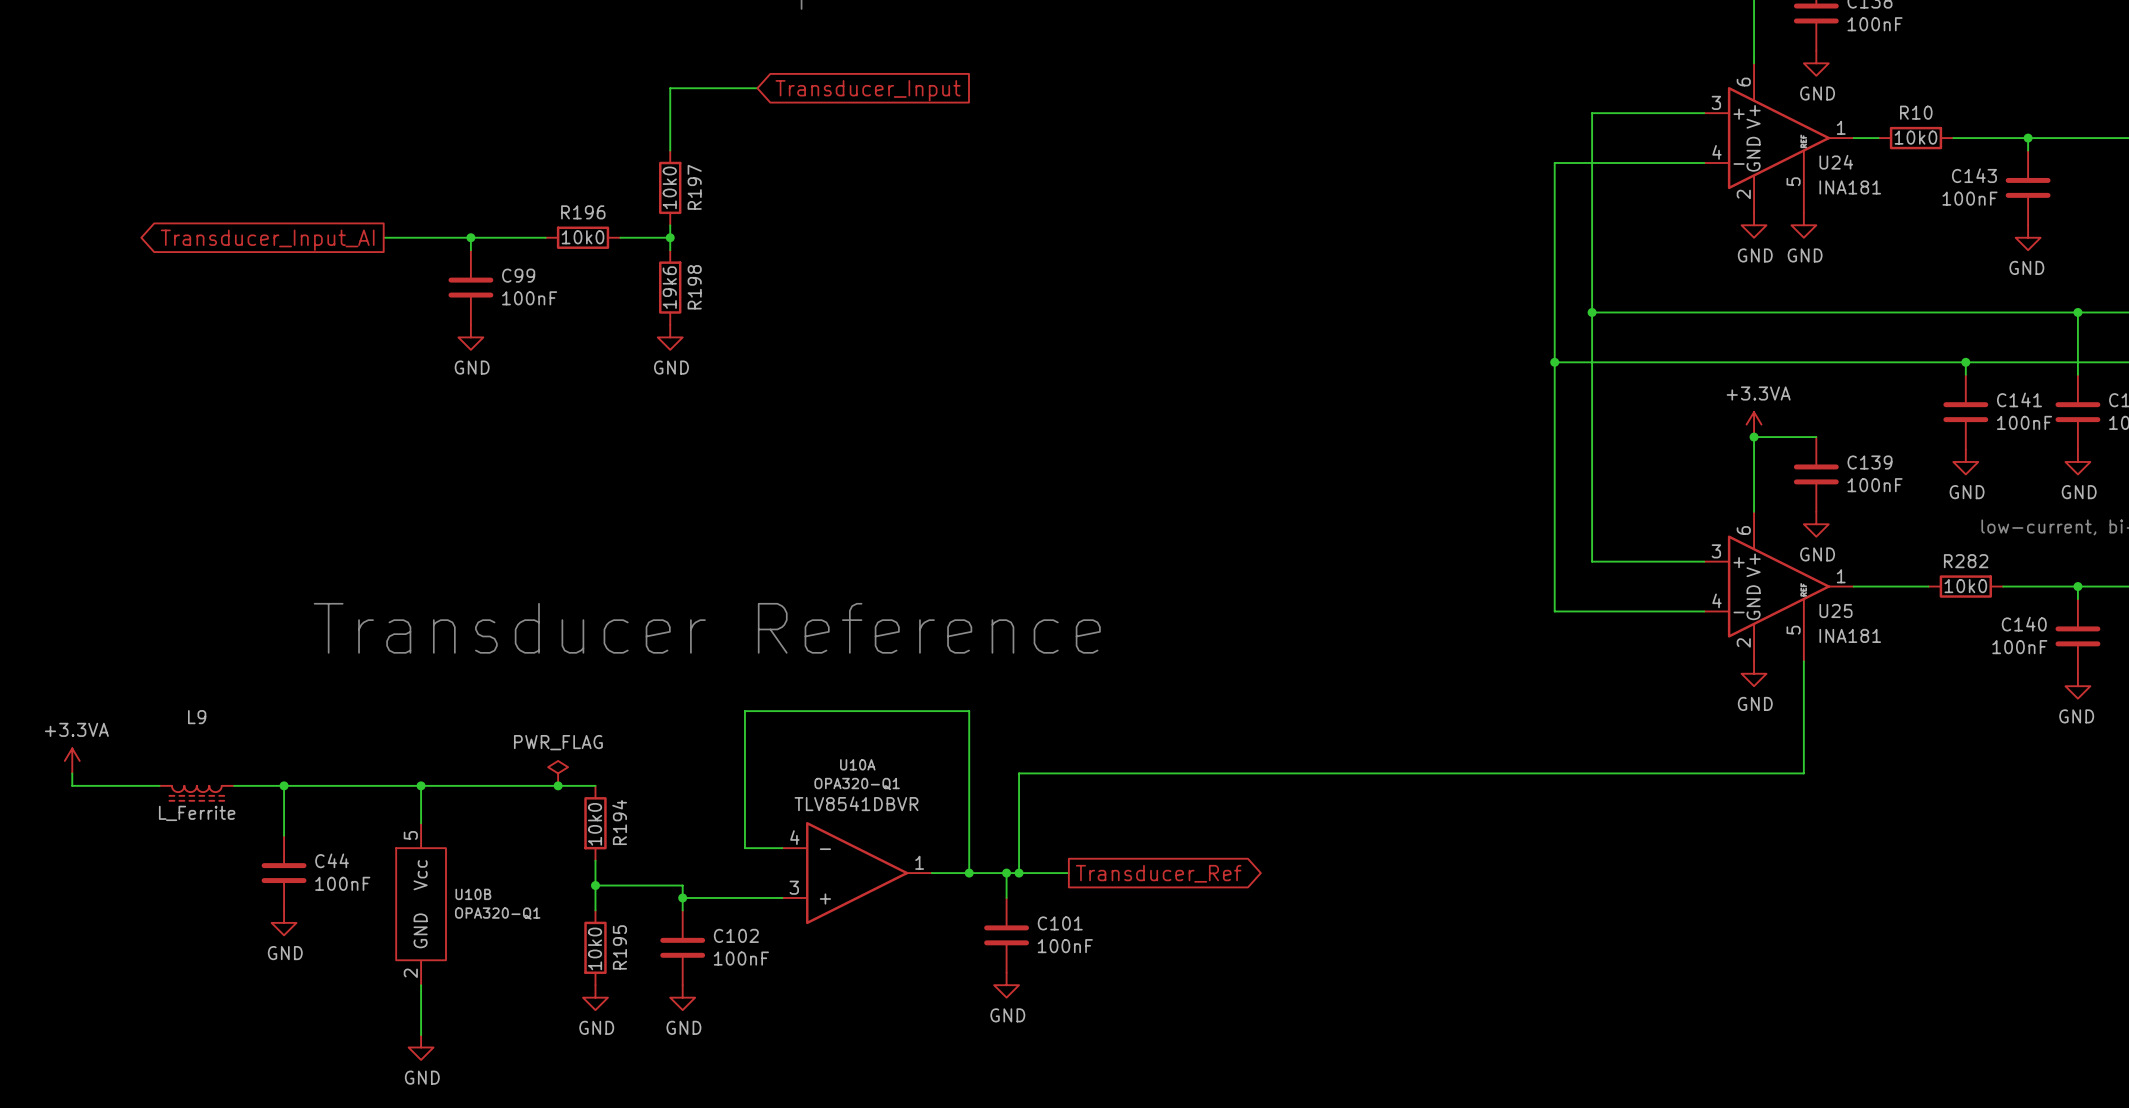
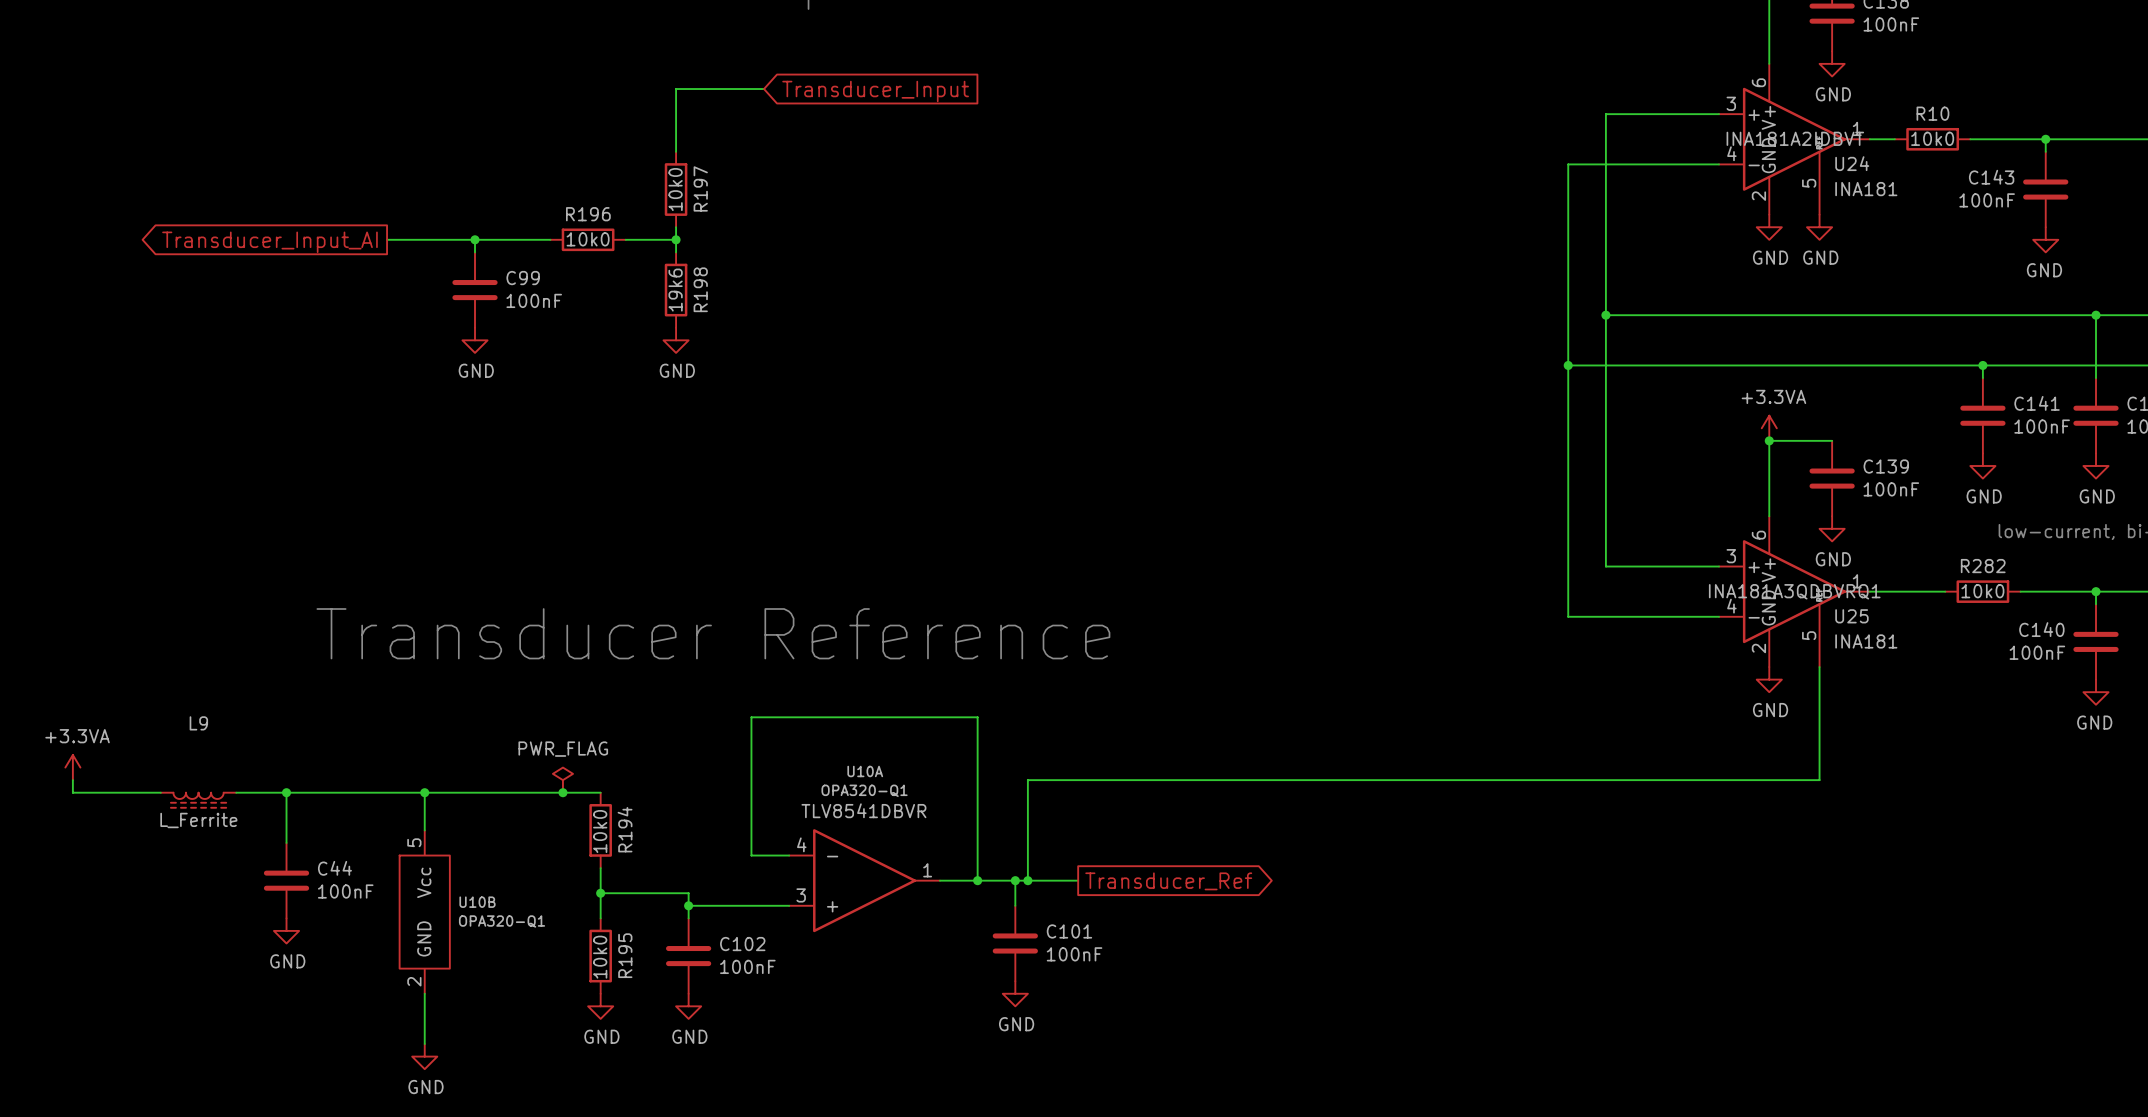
U24 text: none -> INA181A2IDBVT (1795, 138)
U25 text: none -> INA181A3QDBVRQ1 (1794, 591)

